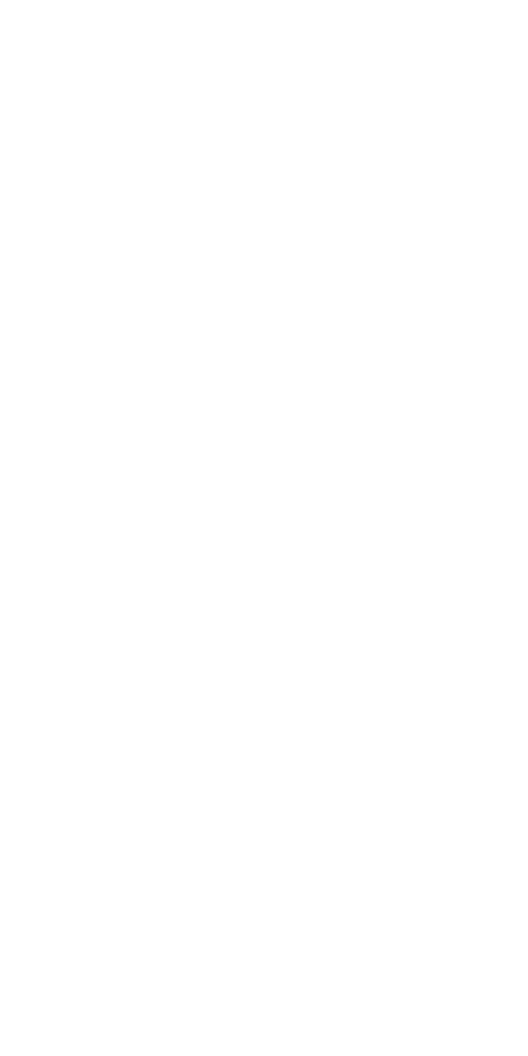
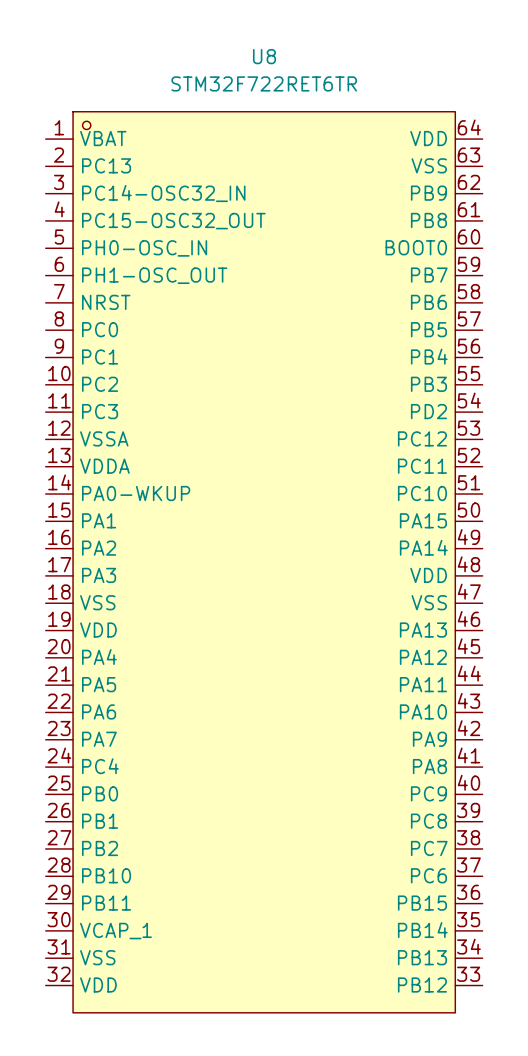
U8: none -> STM32F722RET6TR (264, 562)

